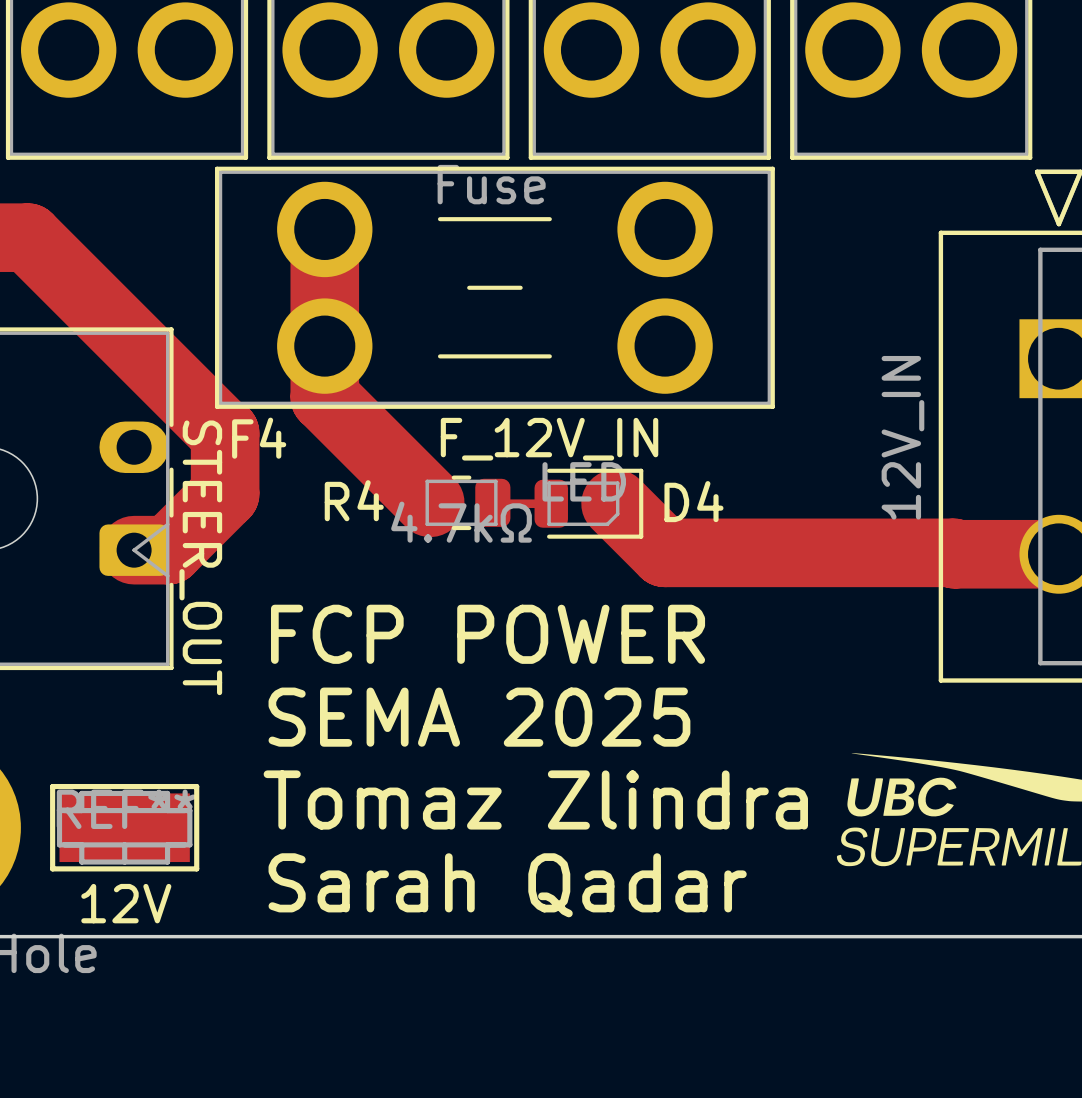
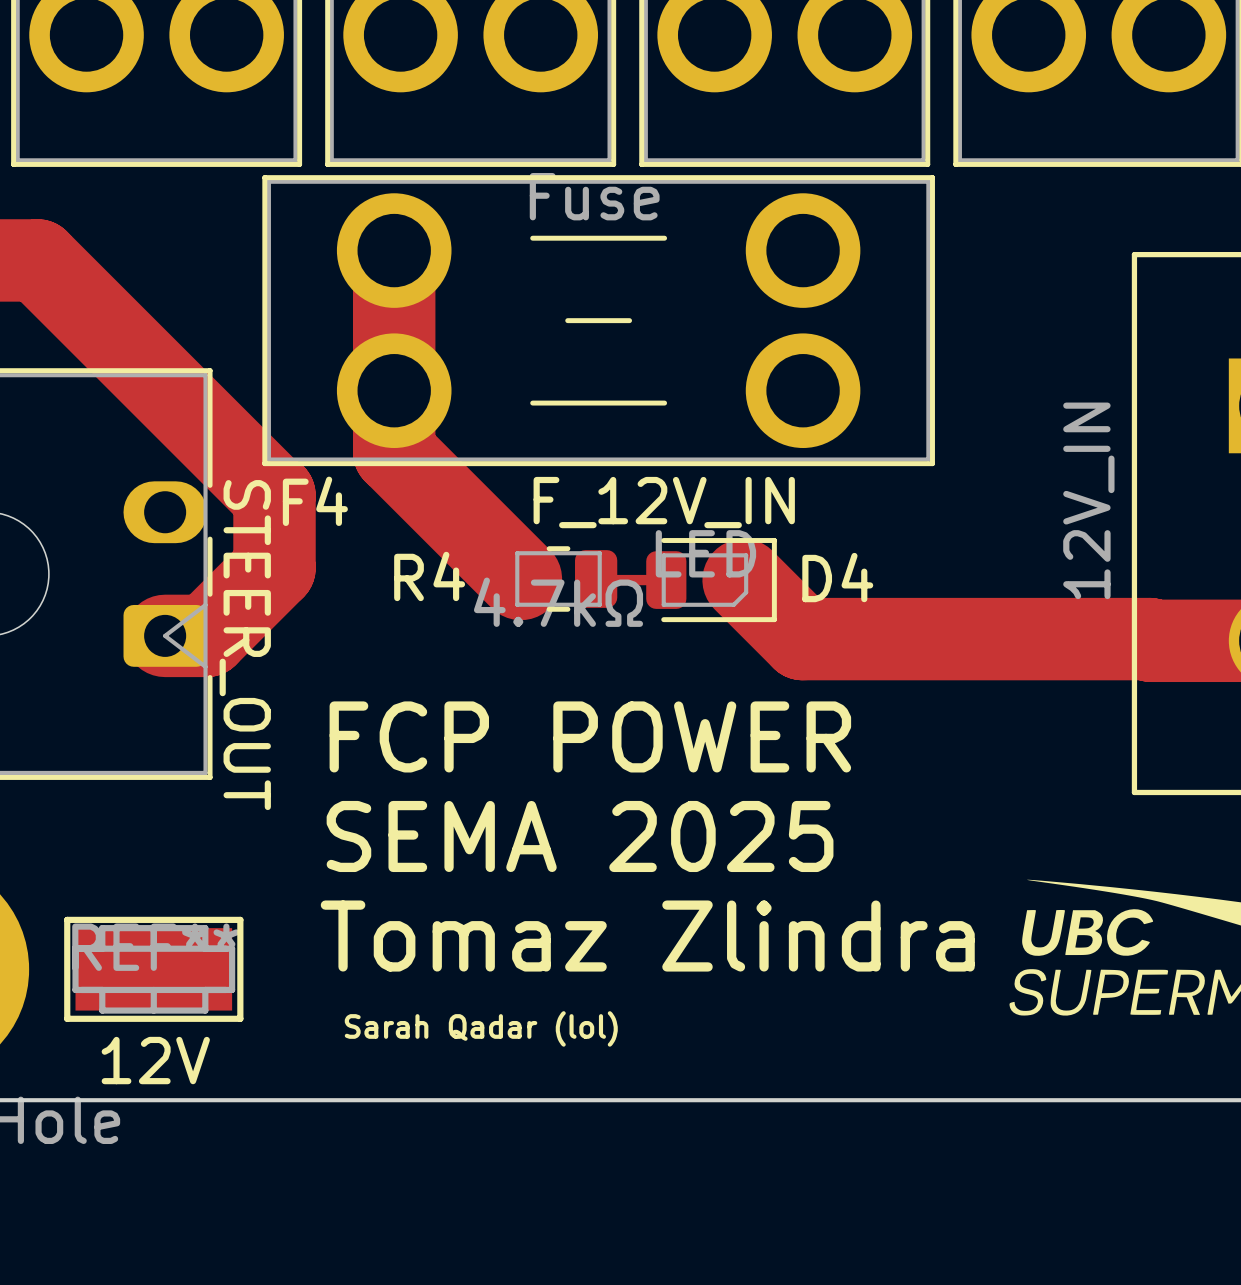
text: Sarah Qadar (507, 885) -> Sarah Qadar (lol) (481, 1028)

